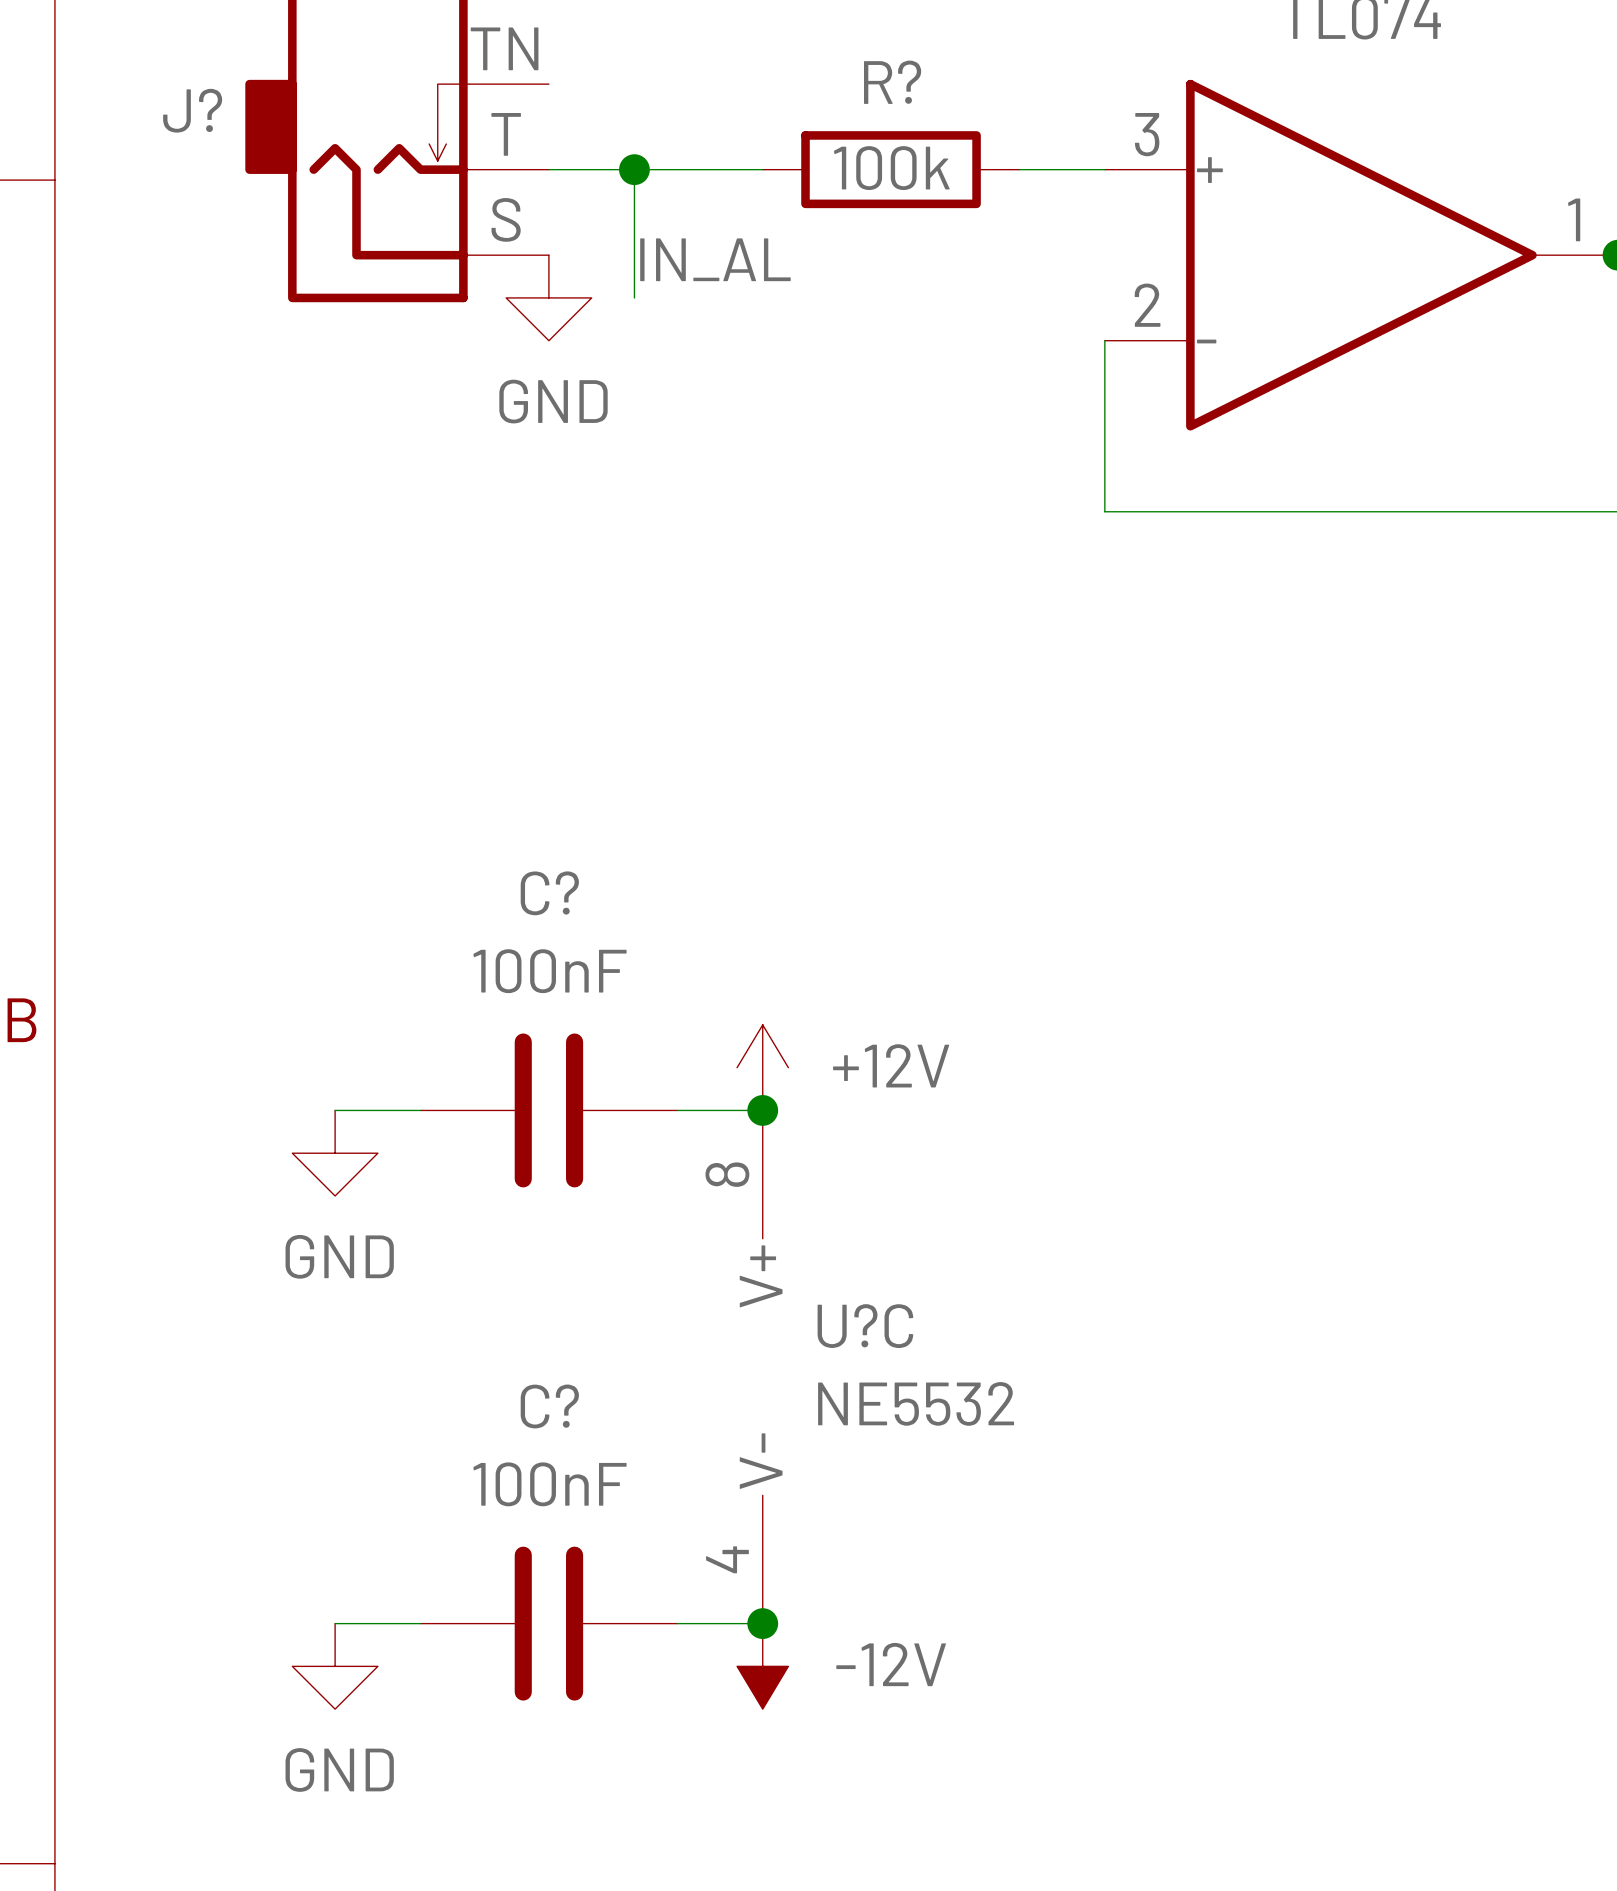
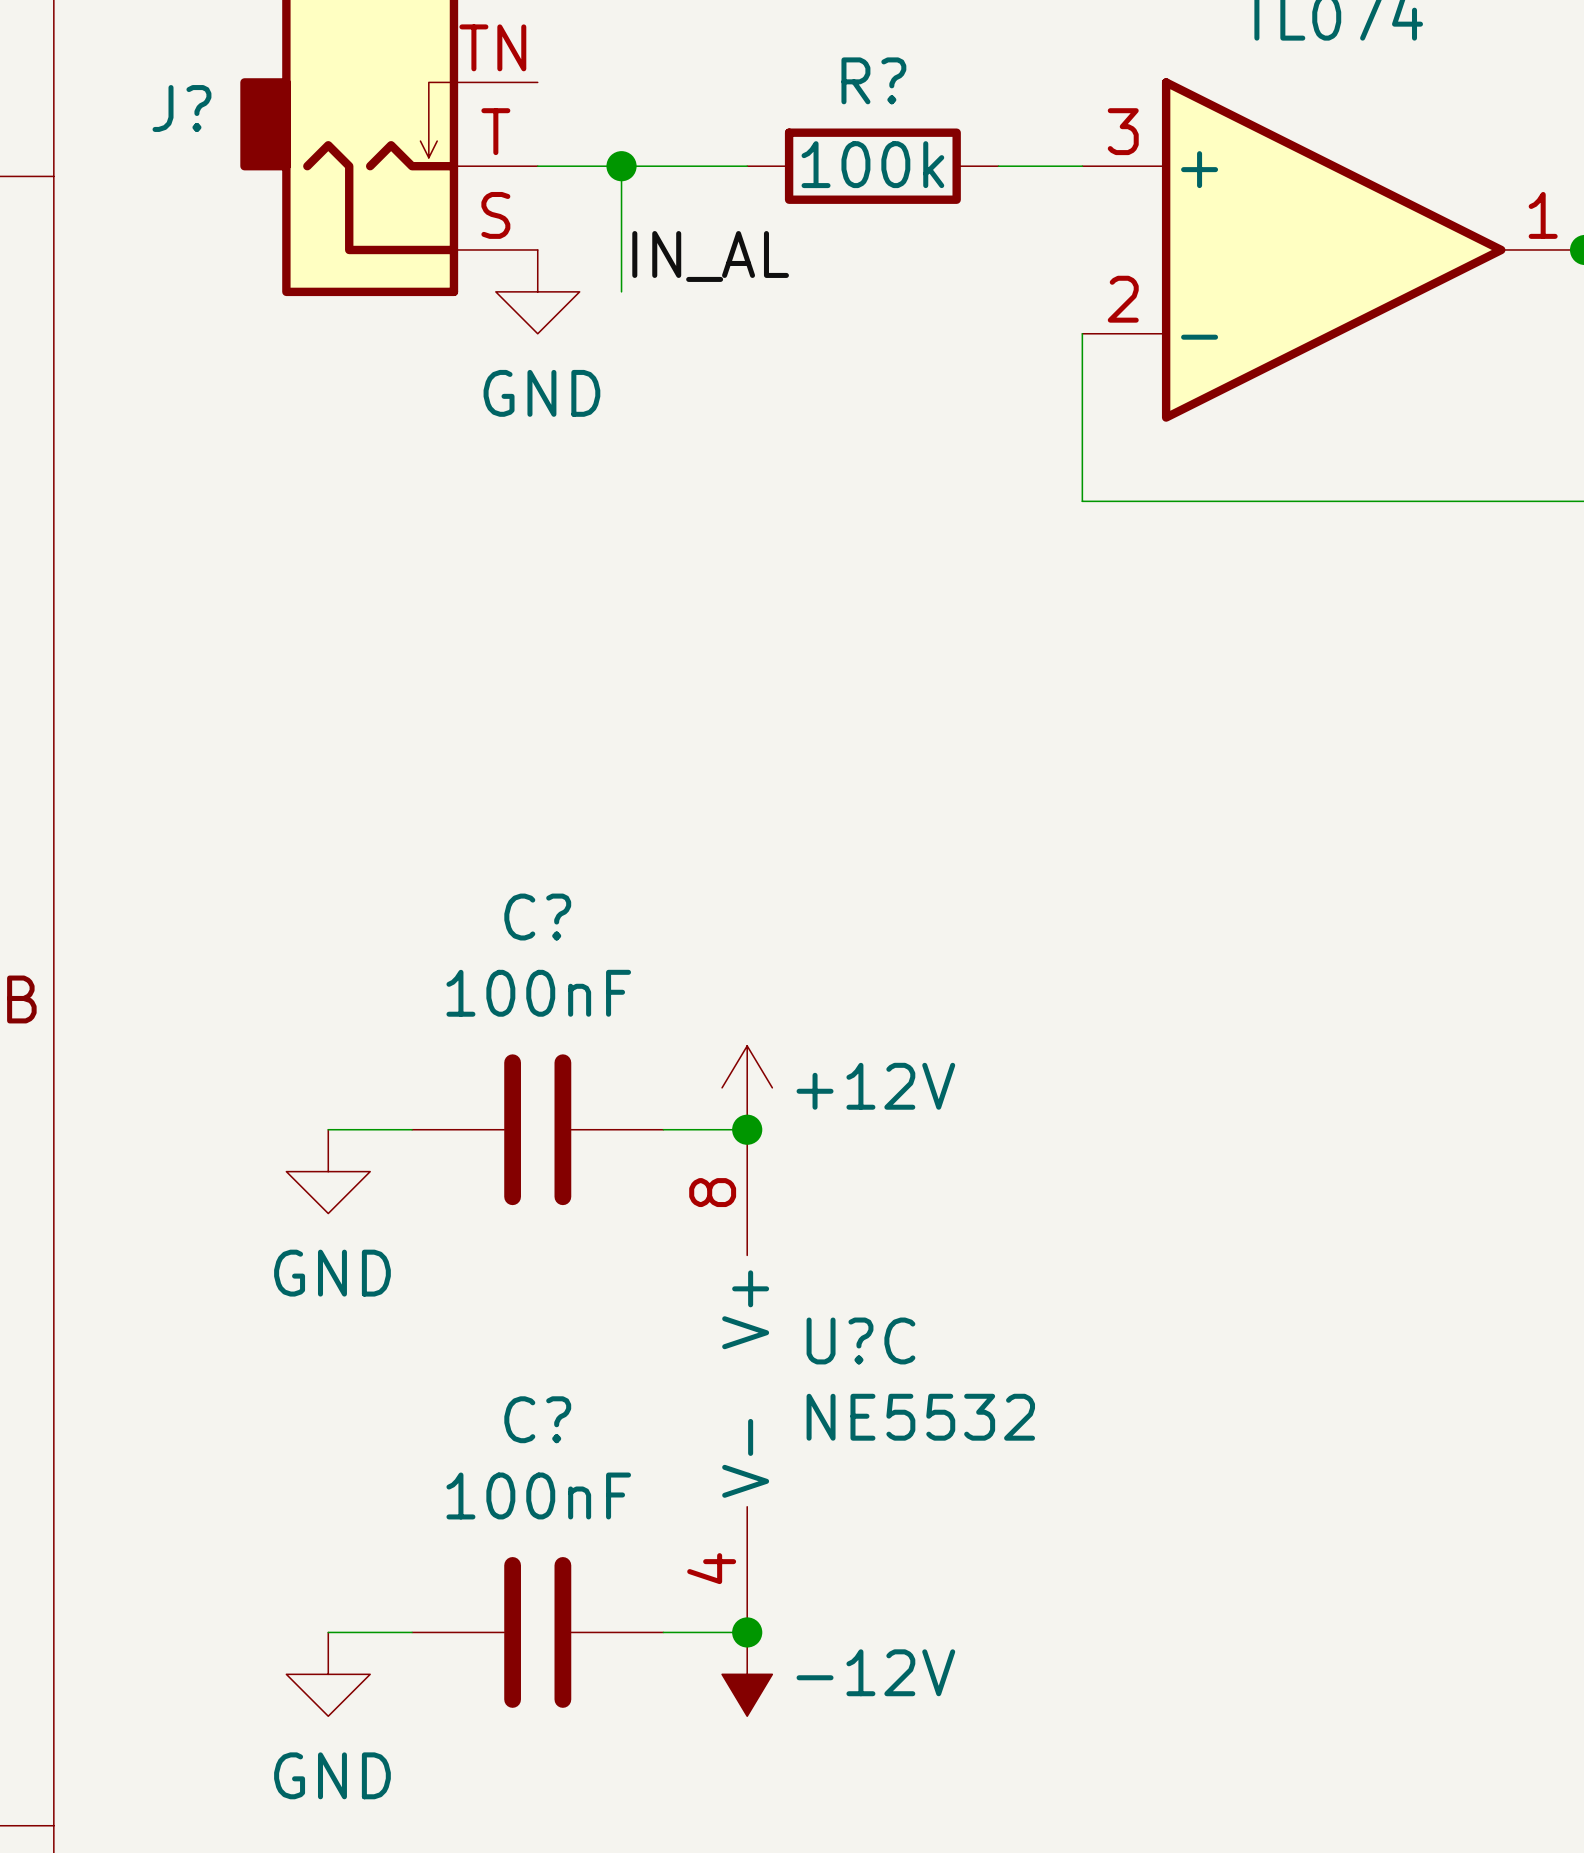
power symbol position: +12V (762, 1067) -> +12V (747, 1087)
wire: (335, 1110) (420, 1110) -> (328, 1129) (412, 1129)
C? position: (548, 1110) -> (537, 1129)
wire: (677, 1110) (762, 1110) -> (663, 1129) (747, 1129)
junction position: (762, 1110) -> (747, 1129)
power symbol position: GND (335, 1153) -> GND (328, 1171)
U?C position: (762, 1367) -> (747, 1381)
wire: (335, 1623) (420, 1623) -> (328, 1632) (412, 1632)
C? position: (548, 1623) -> (537, 1632)
wire: (677, 1623) (762, 1623) -> (663, 1632) (747, 1632)
junction position: (762, 1623) -> (747, 1632)
power symbol position: GND (335, 1666) -> GND (328, 1674)
power symbol position: -12V (762, 1666) -> -12V (747, 1674)

